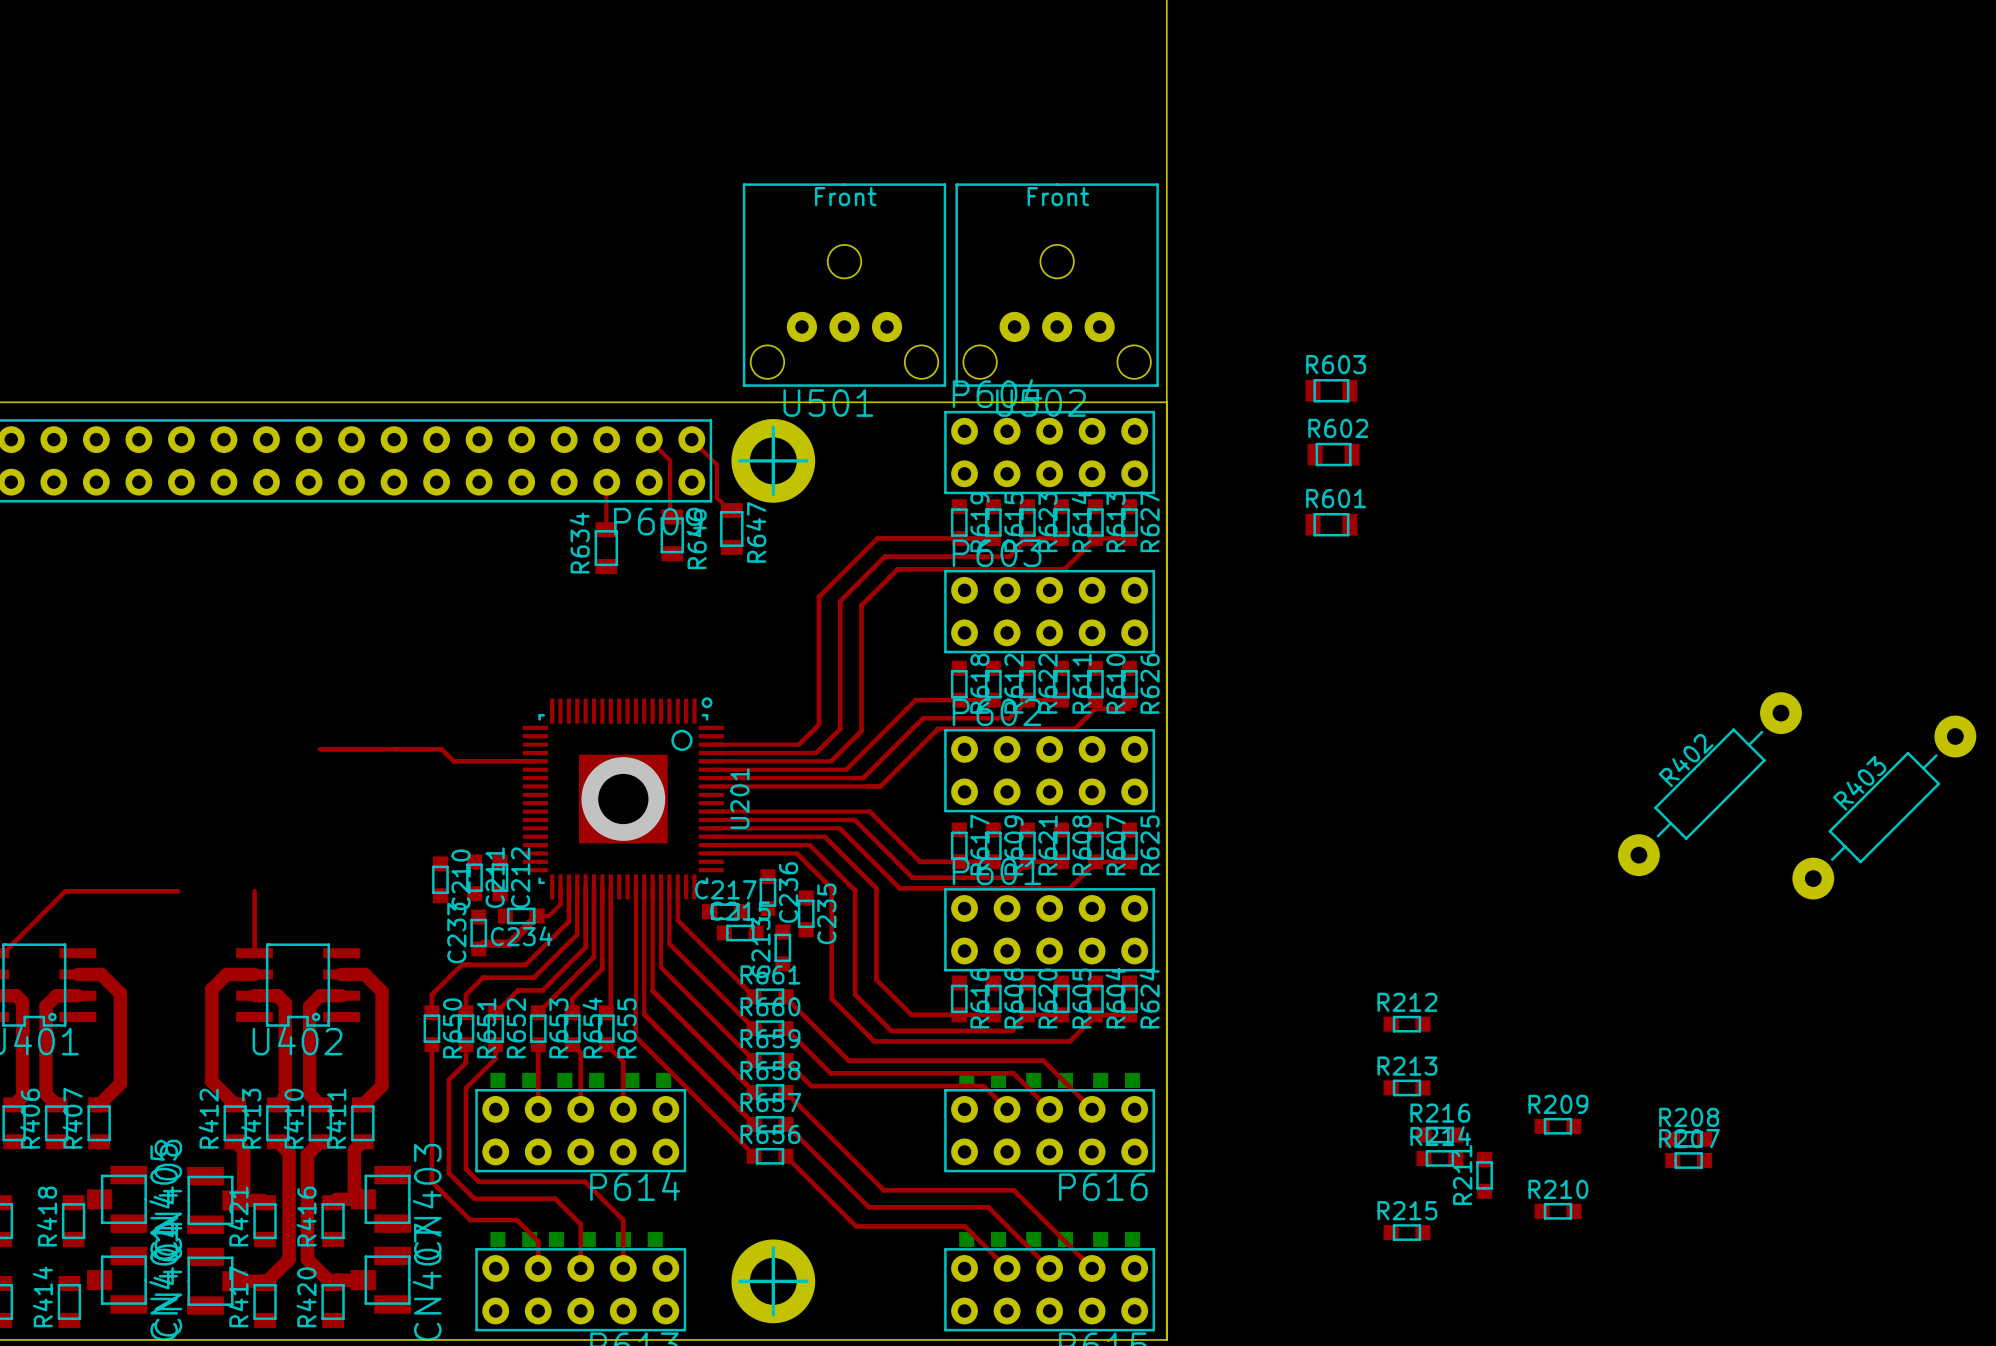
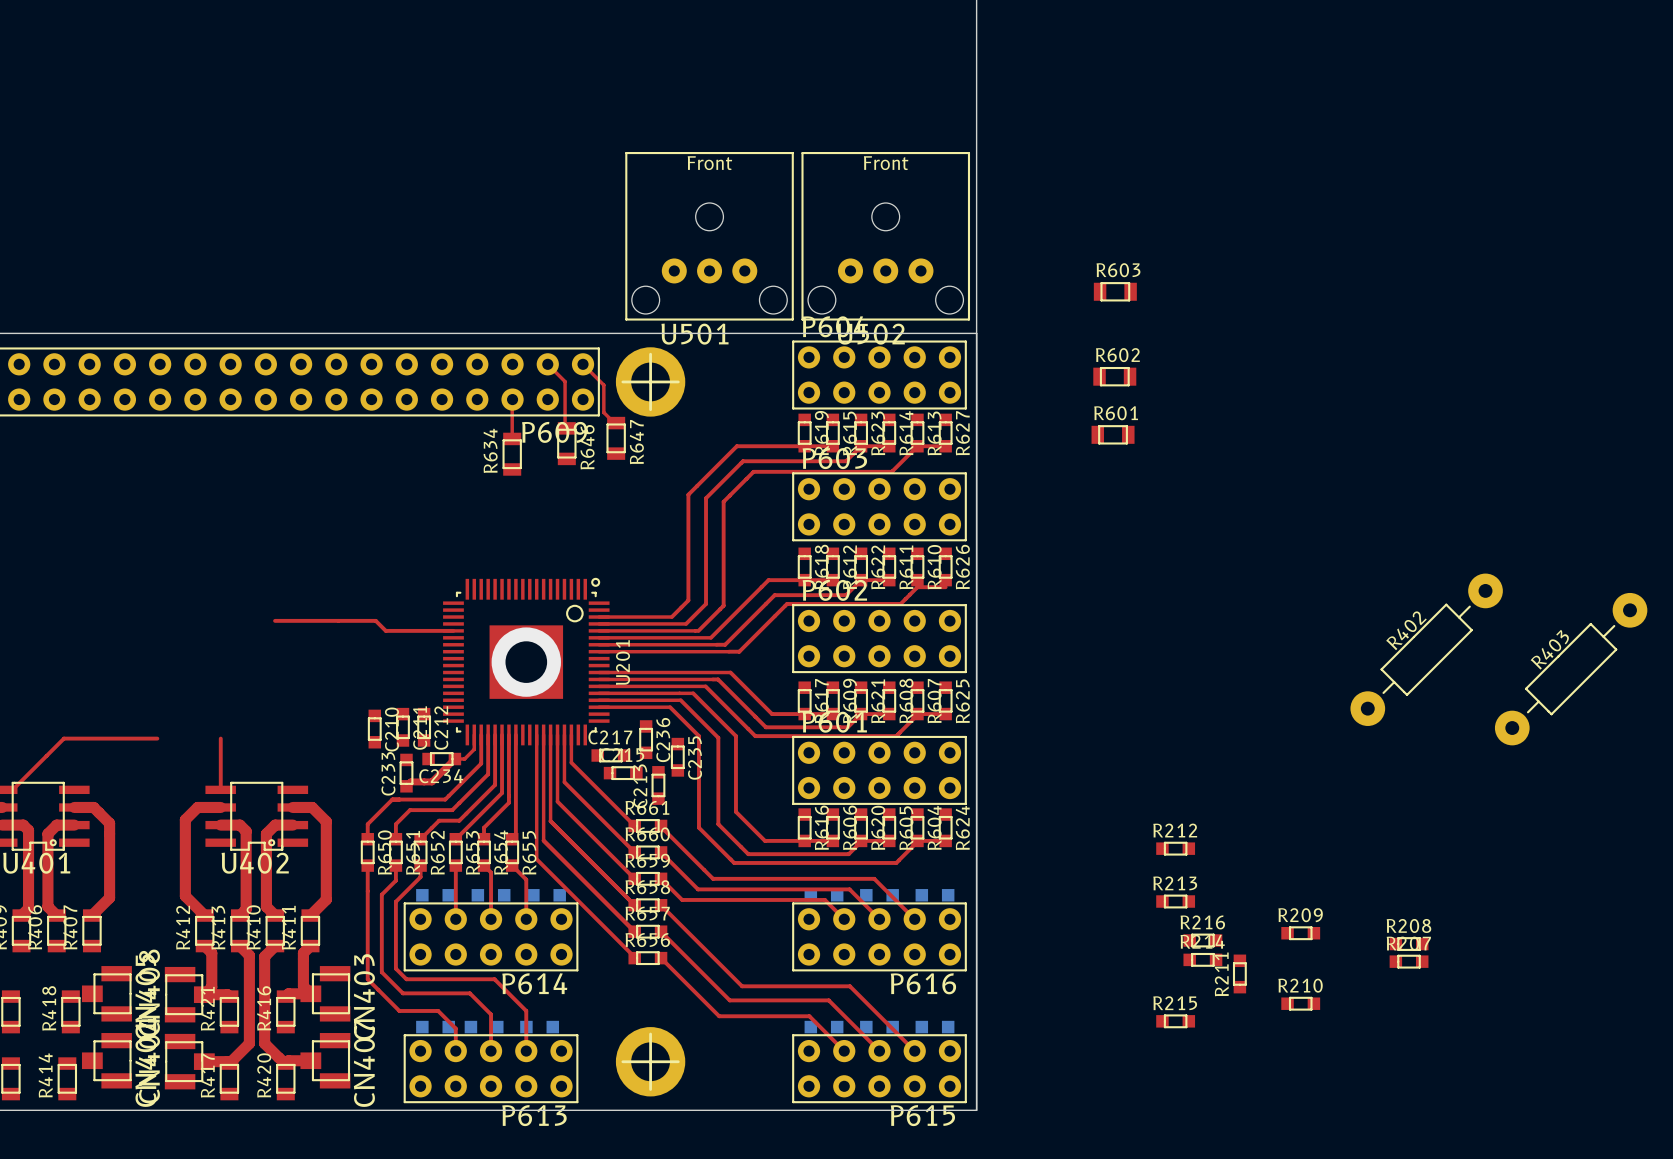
R603 position: (1331, 390) -> (1115, 291)

